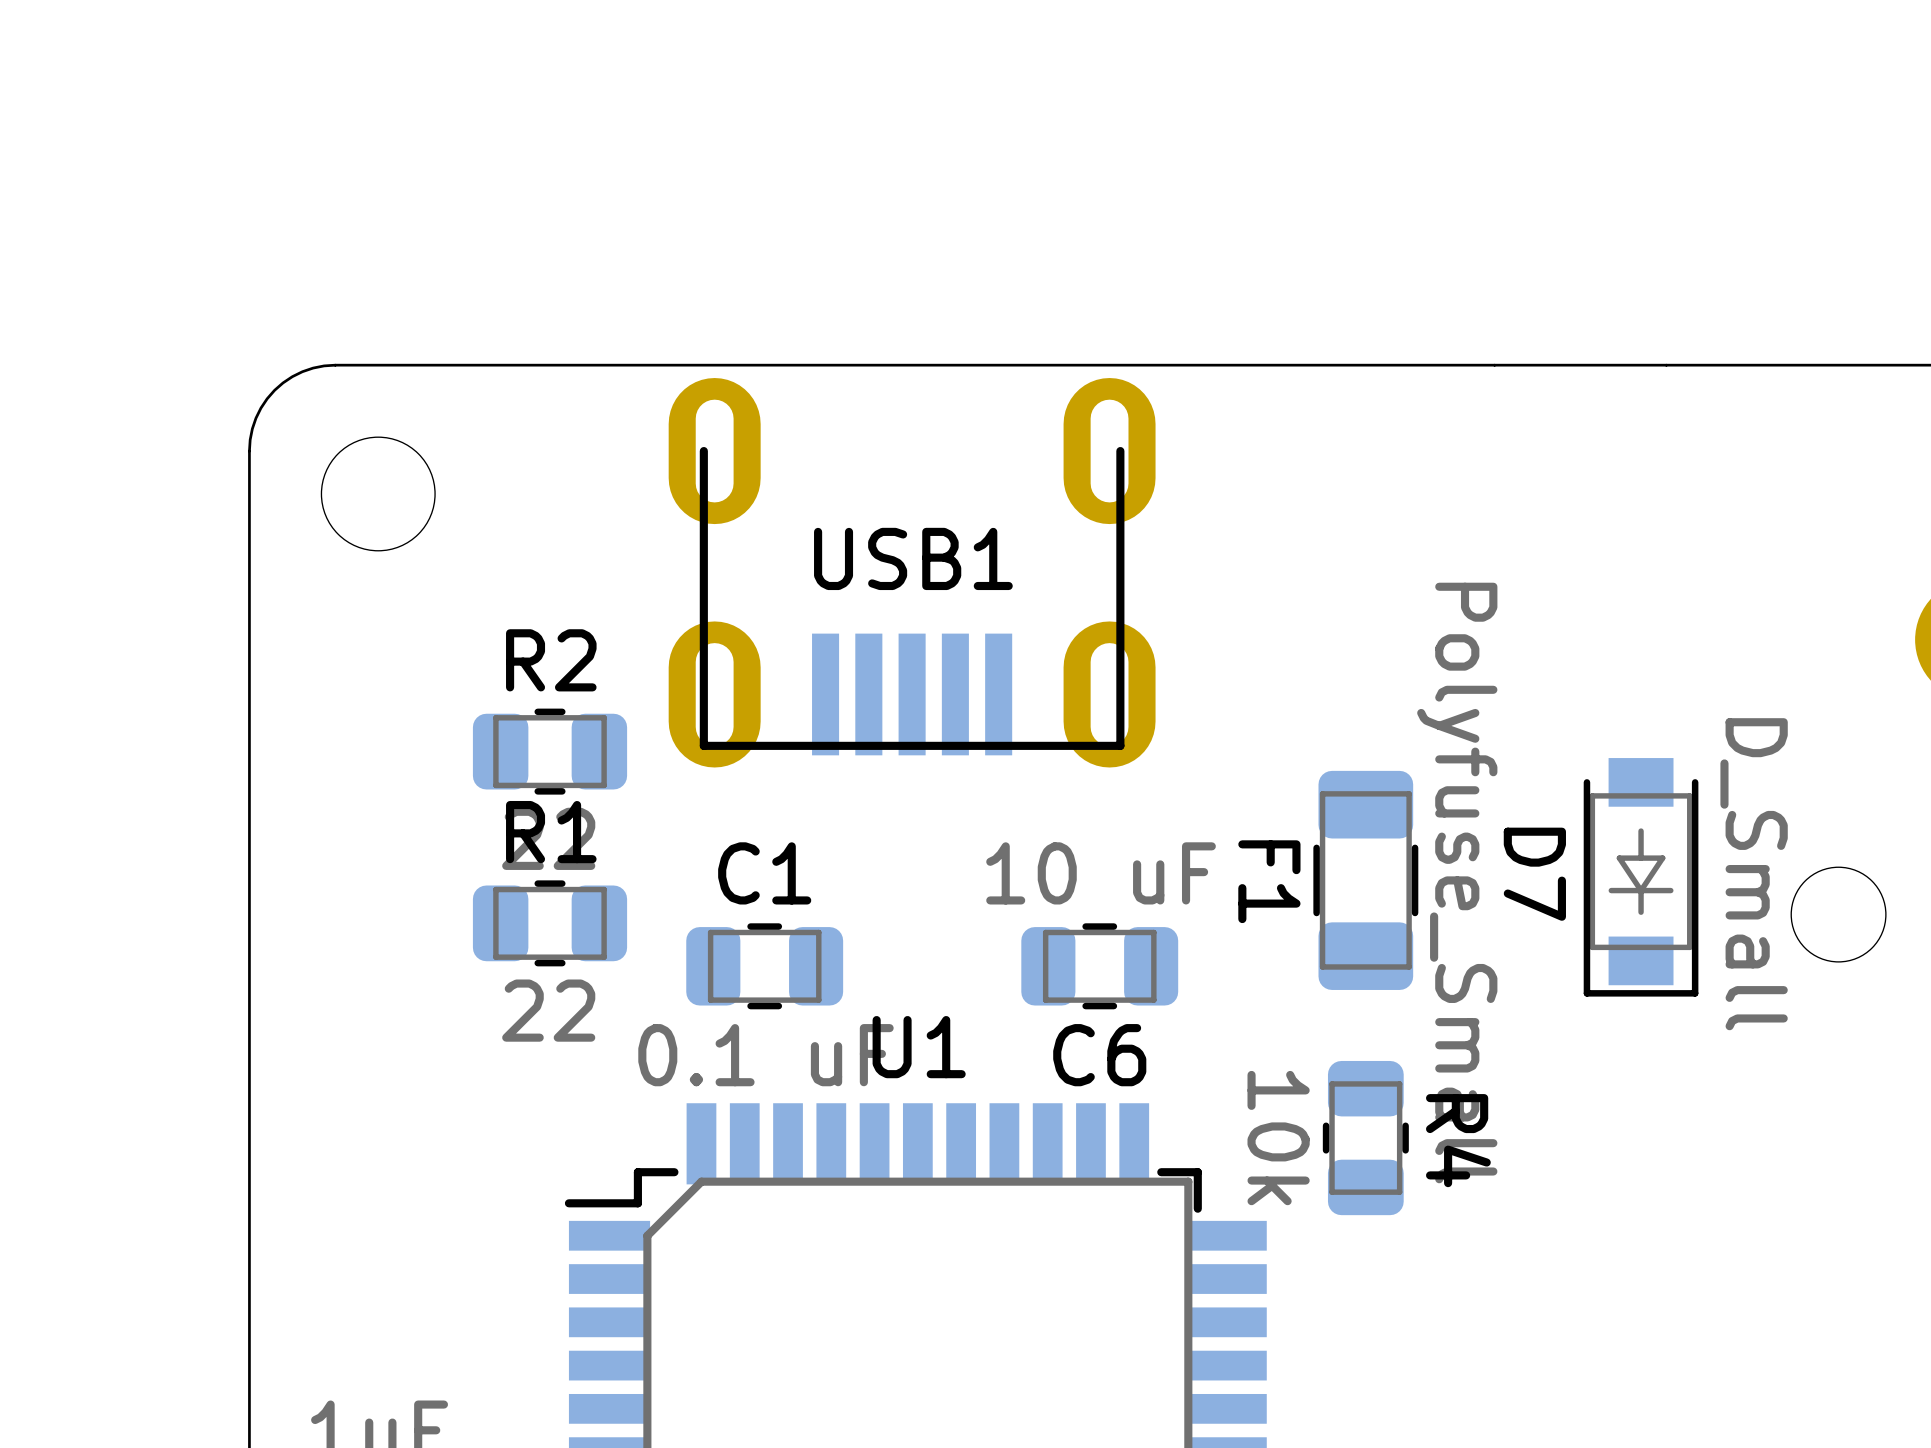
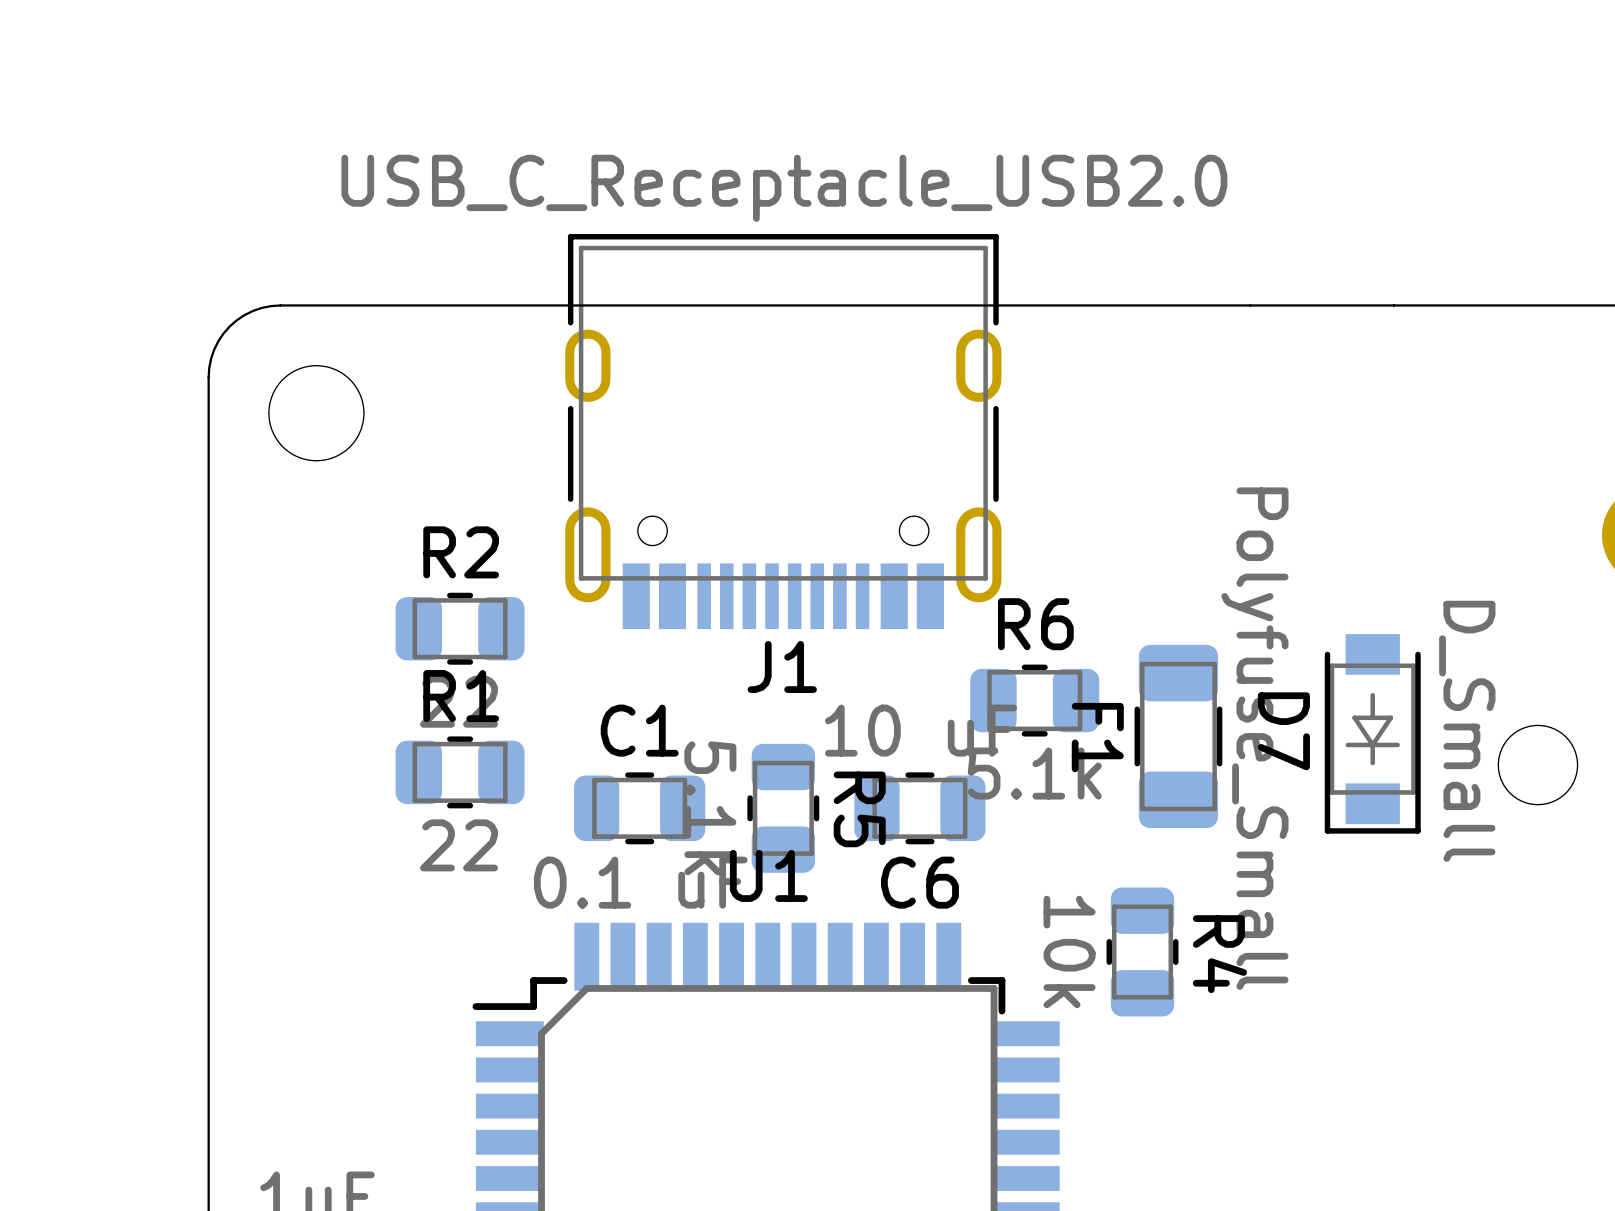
J1: none -> USB_C_Receptacle_USB2.0 (783, 431)
USB1: (912, 572) -> none
R6: none -> 5.1k (1034, 700)
F1 position: (1365, 880) -> (1178, 736)
R5: none -> 5.1k (783, 808)

